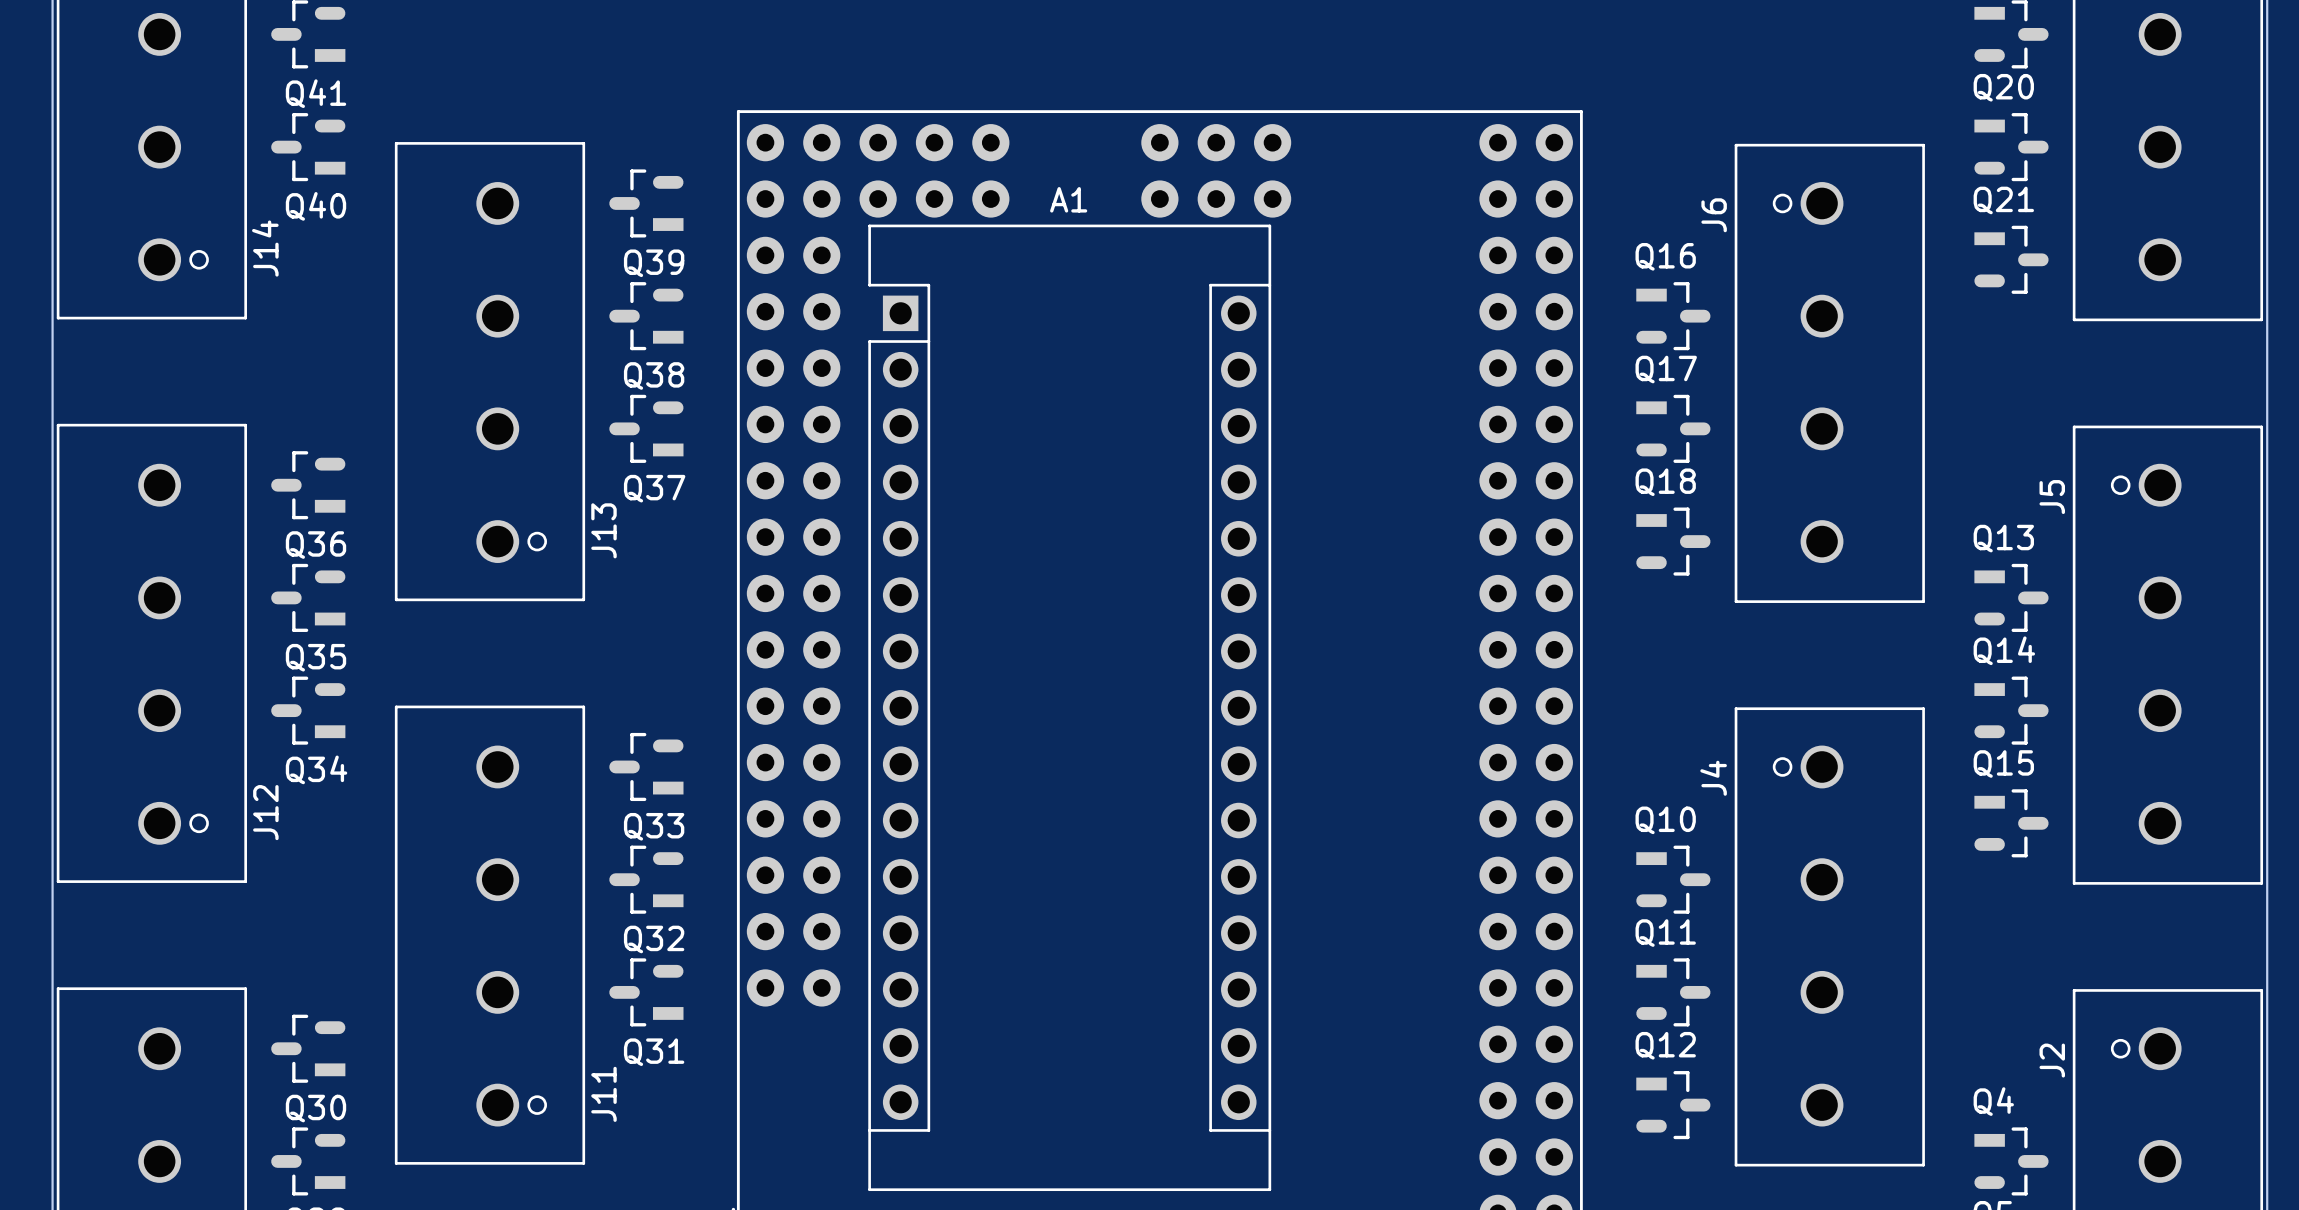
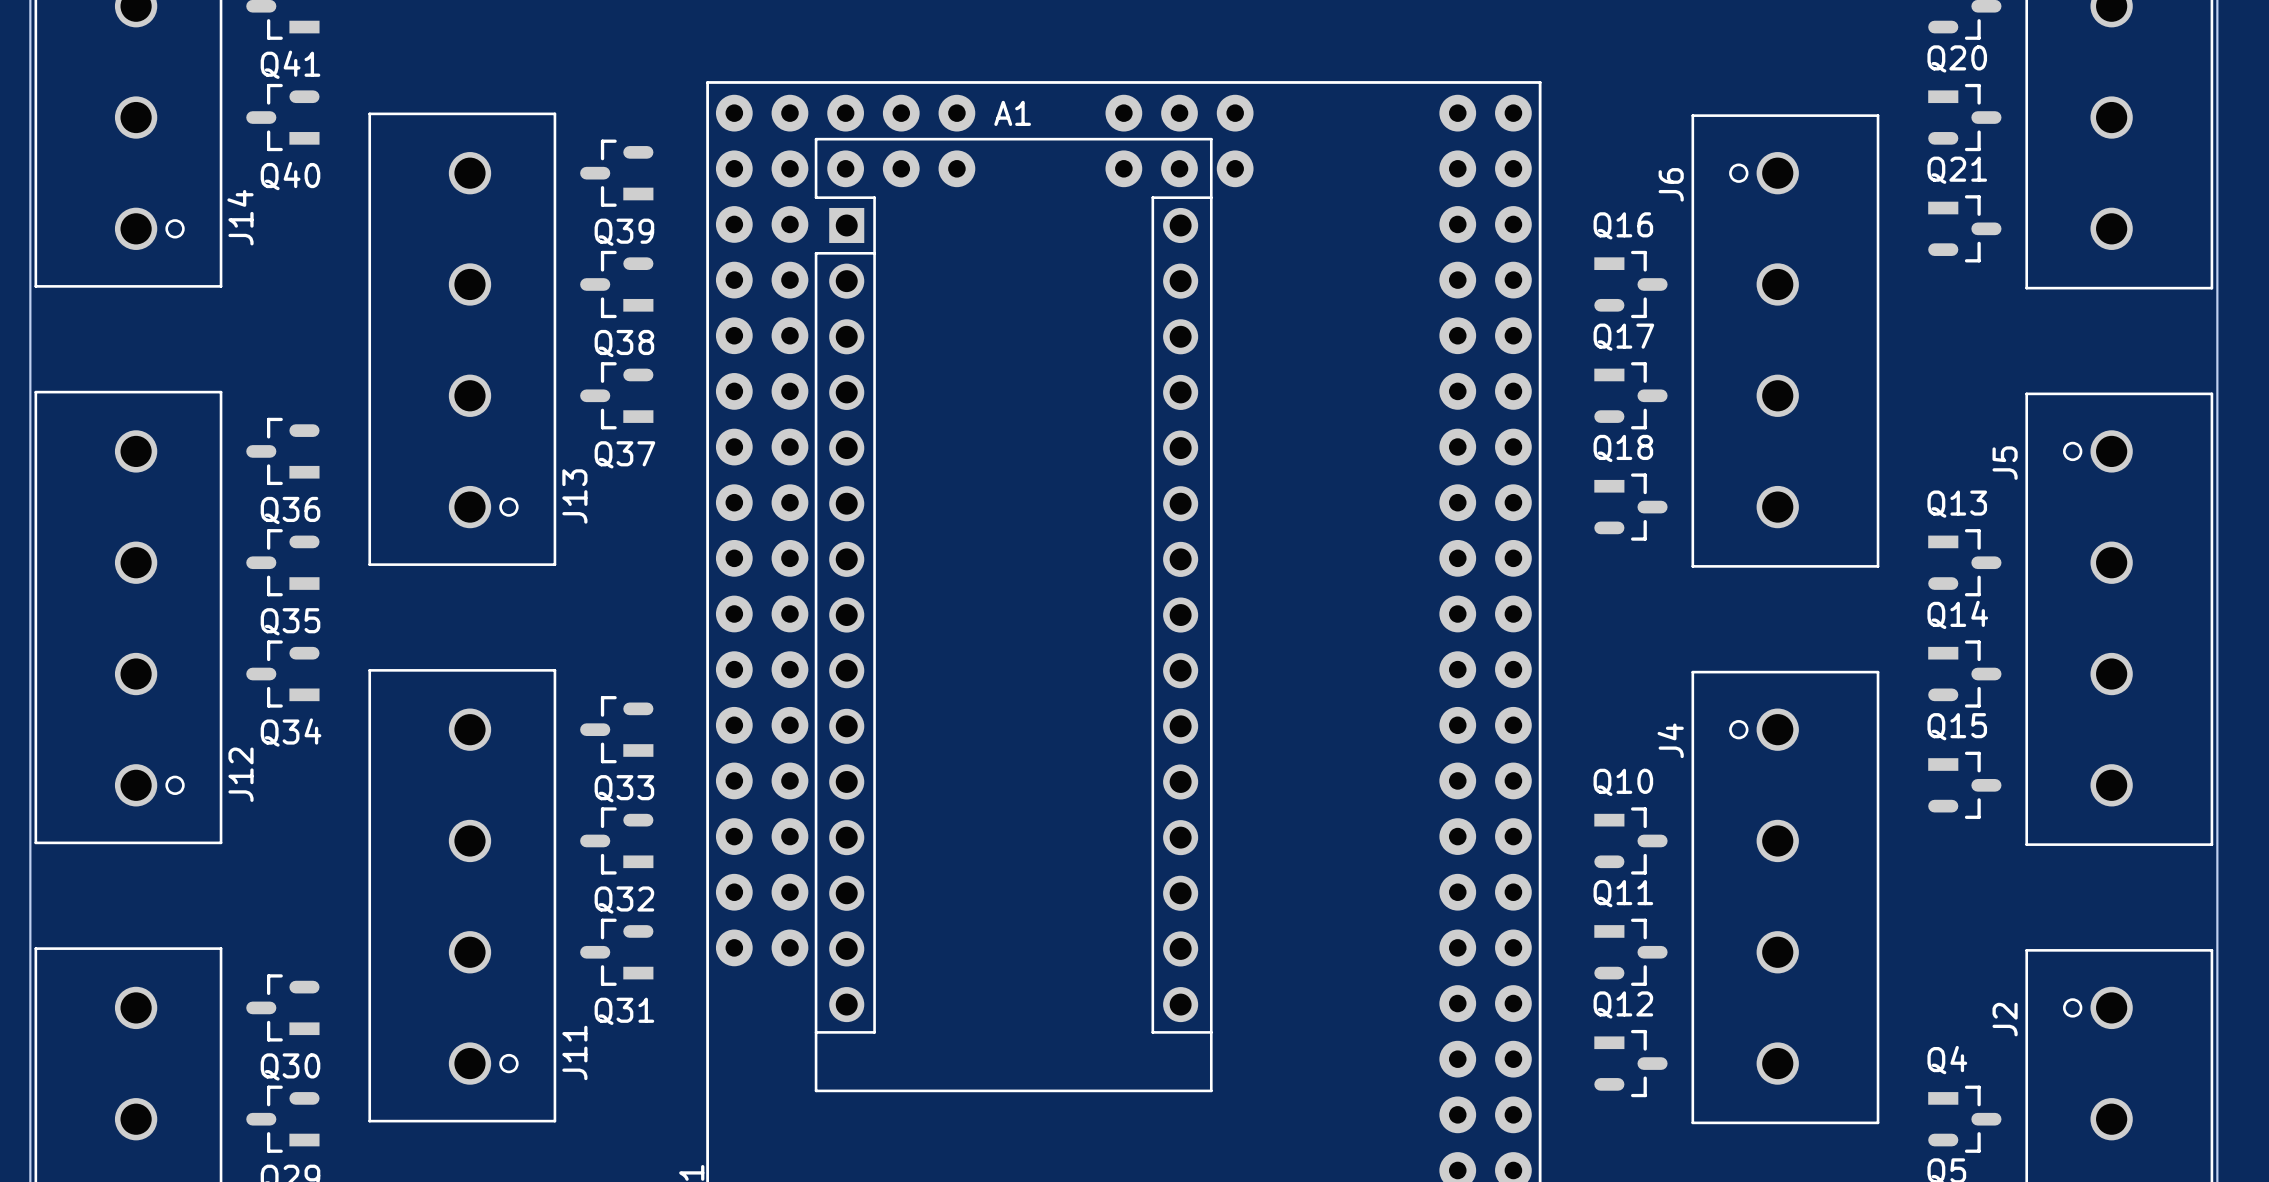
A1 position: (1069, 707) -> (1013, 615)

